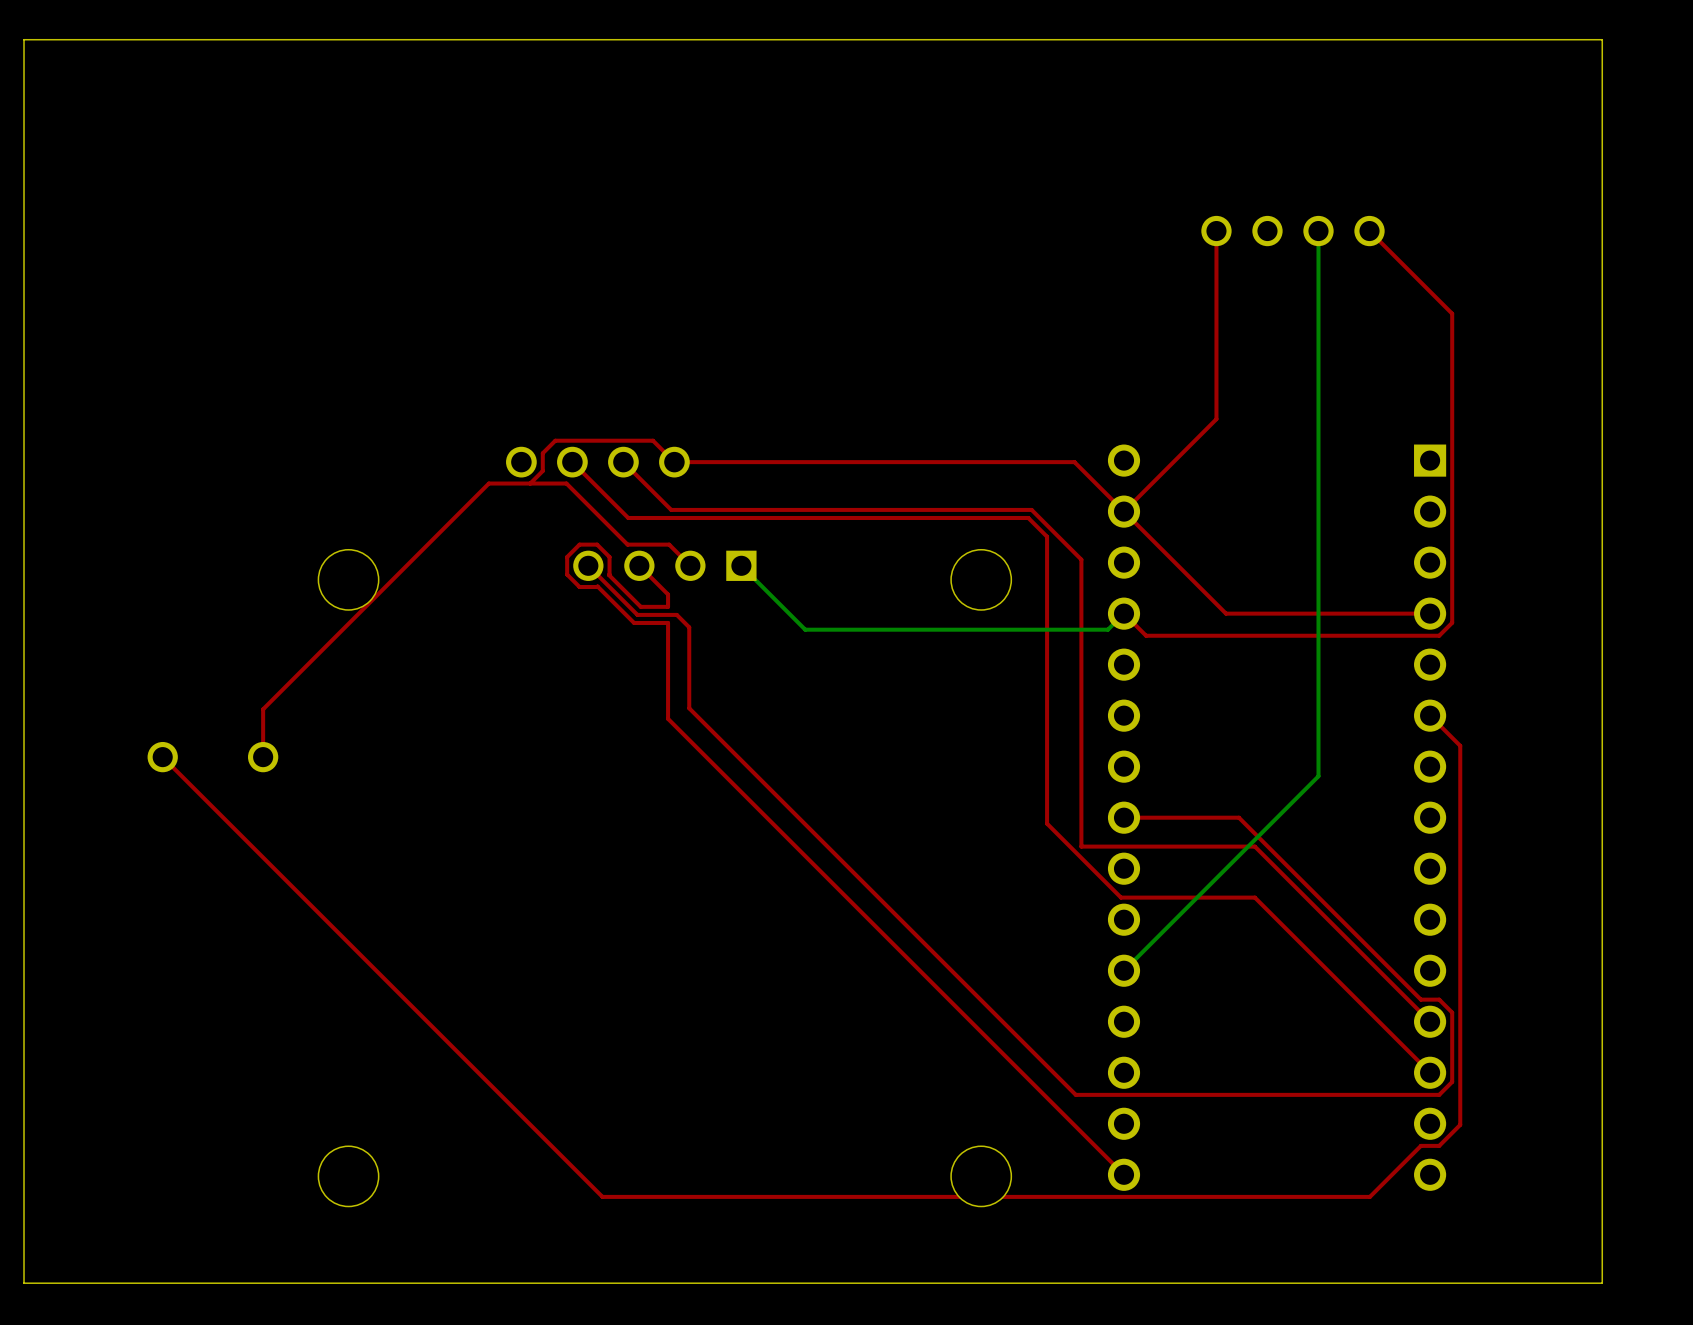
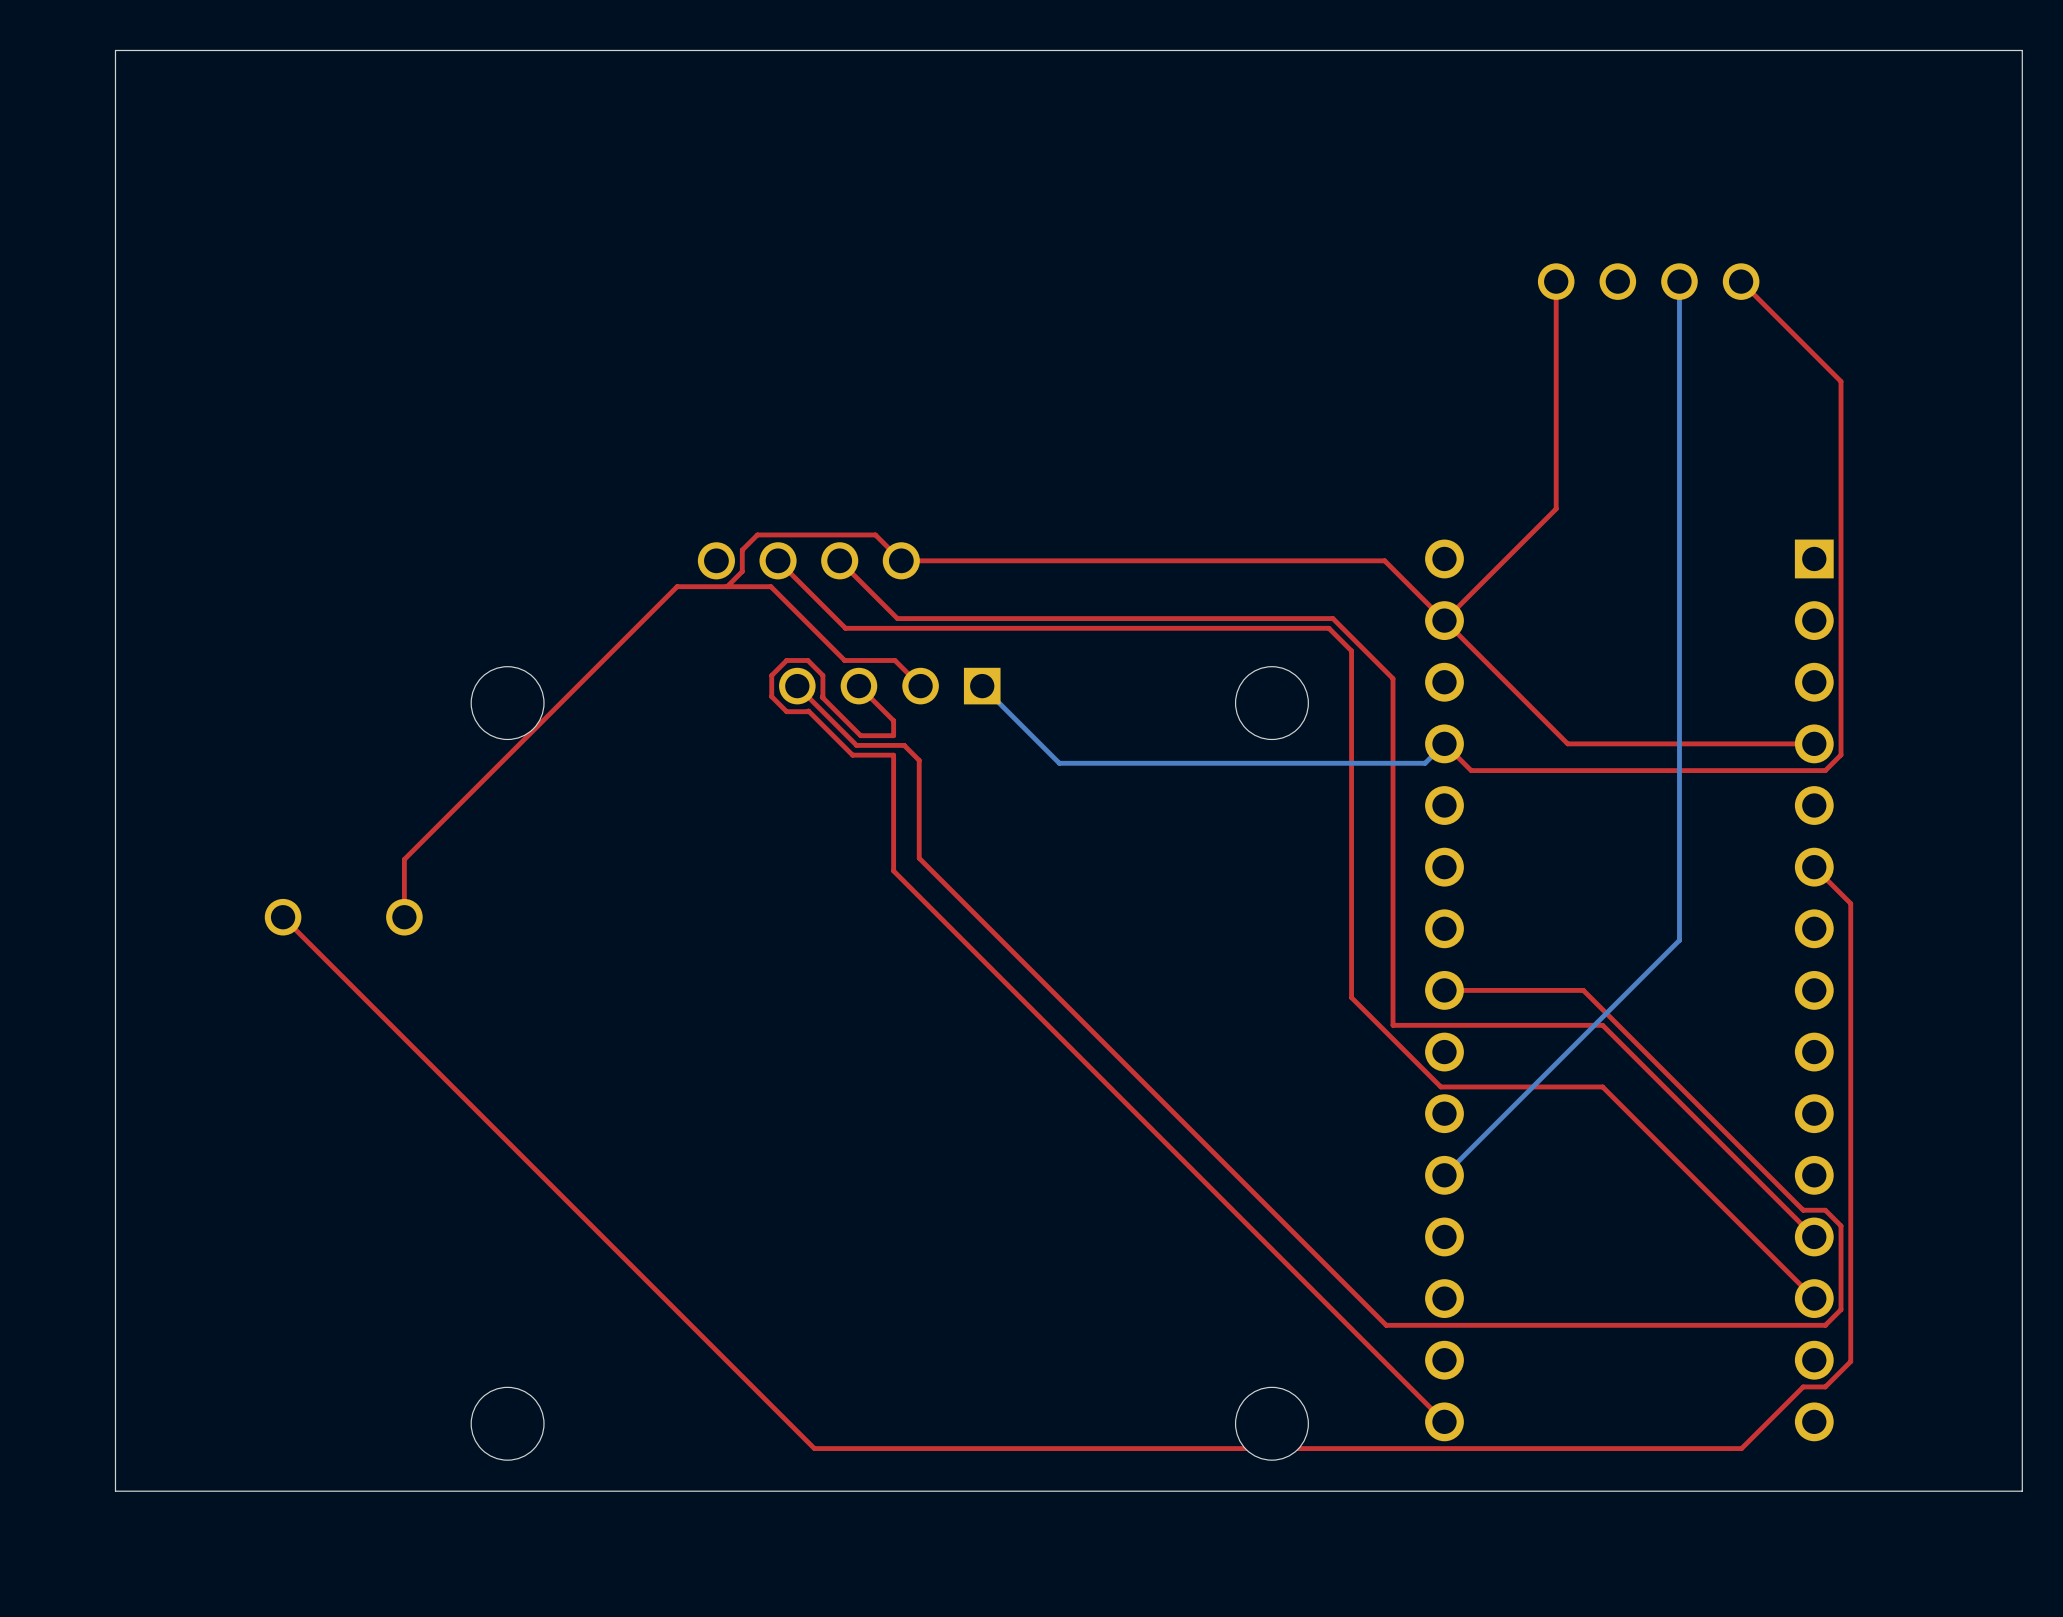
board edge: (1602, 1232) (1602, 1283) (24, 1283) (24, 1232) -> (2022, 1491) (115, 1491)

